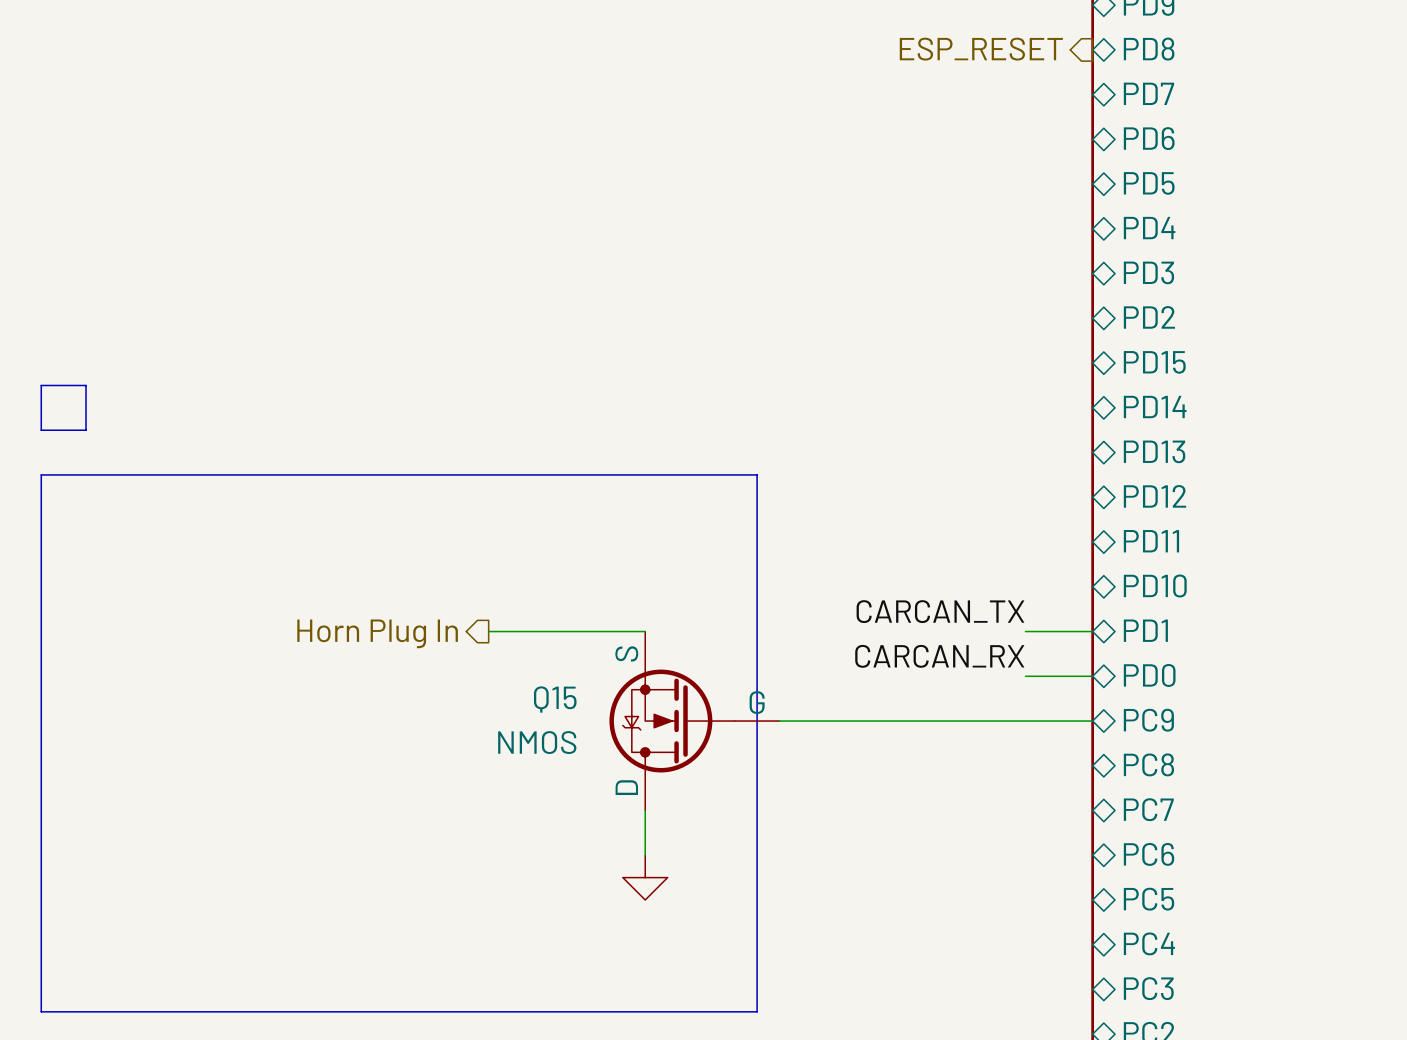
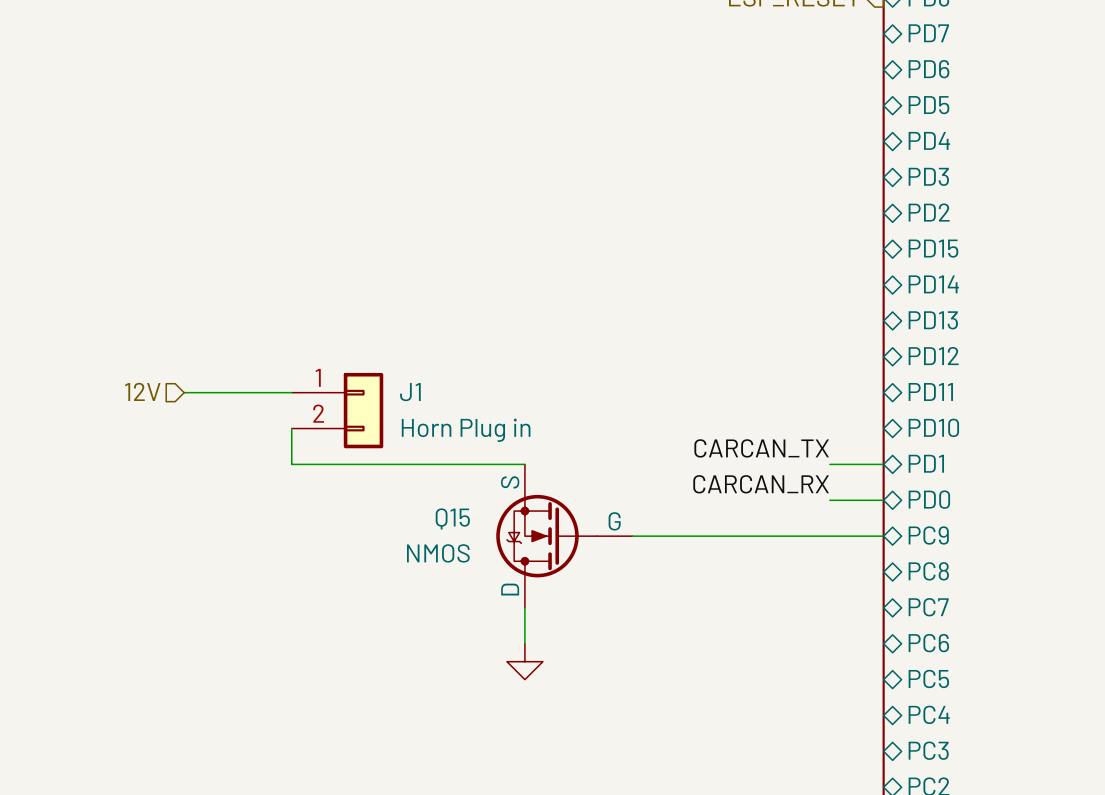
line: (41, 385) (86, 385) (86, 430) (41, 430) (41, 385) -> none
line: (41, 474) (41, 1011) (757, 1011) (757, 474) (41, 474) -> none
hierarchical label: none -> 12V (142, 391)
wire: none -> (184, 392) (291, 392)
J1: none -> Horn Plug in (337, 410)
wire: none -> (291, 428) (291, 464) (399, 464)
hierarchical label: Horn Plug In (377, 633) -> none

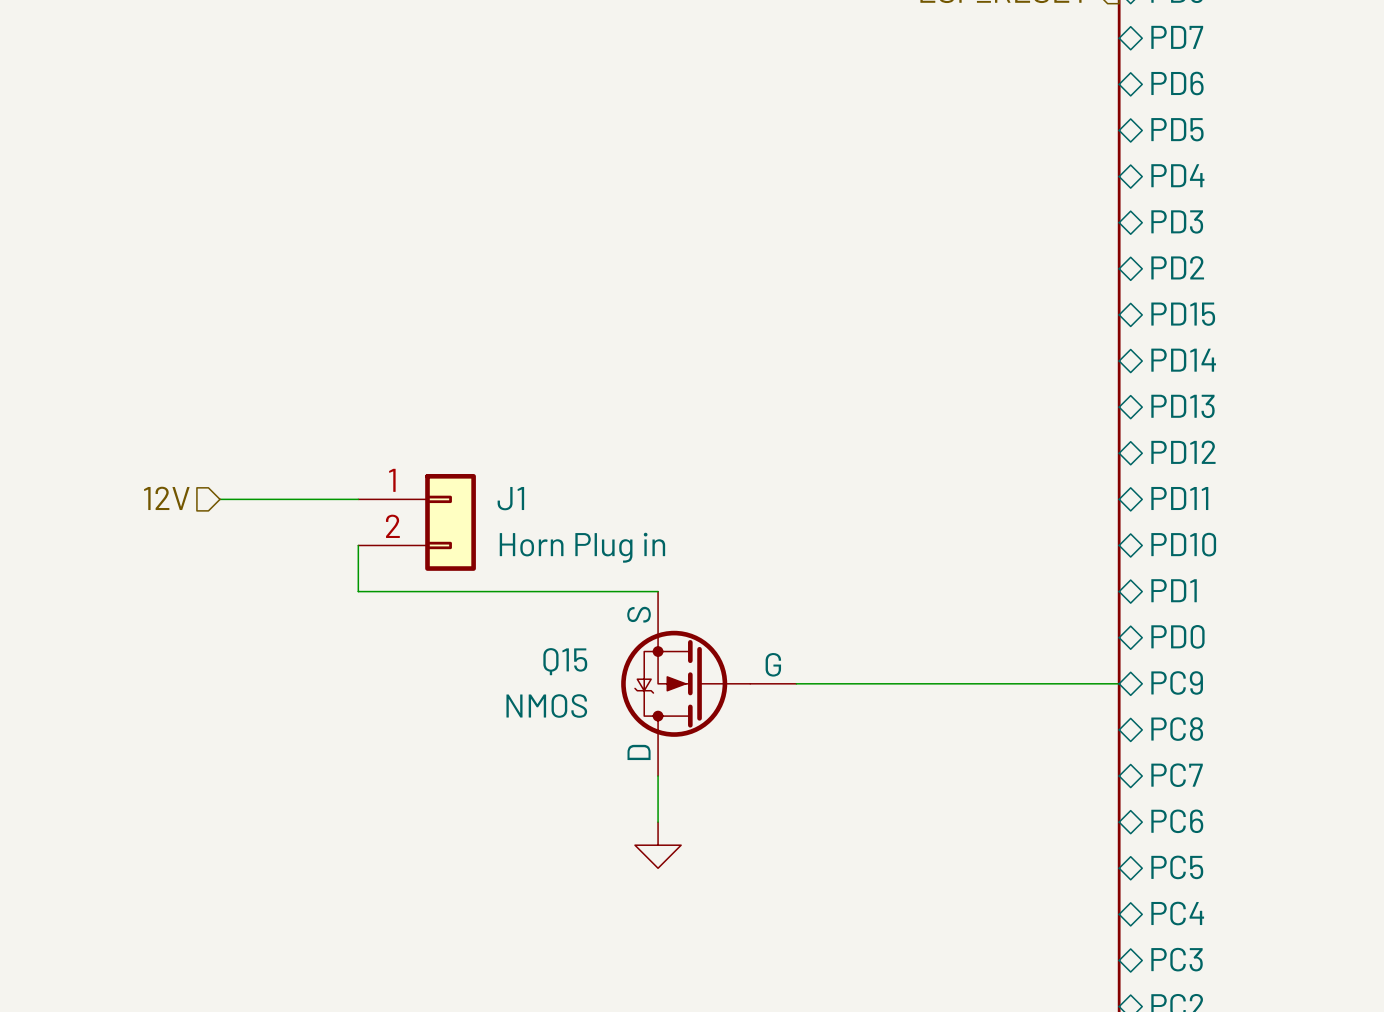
label: CARCAN_TX (761, 448) -> none
wire: (829, 464) (883, 464) -> none
label: CARCAN_RX (761, 484) -> none
wire: (829, 500) (883, 500) -> none

